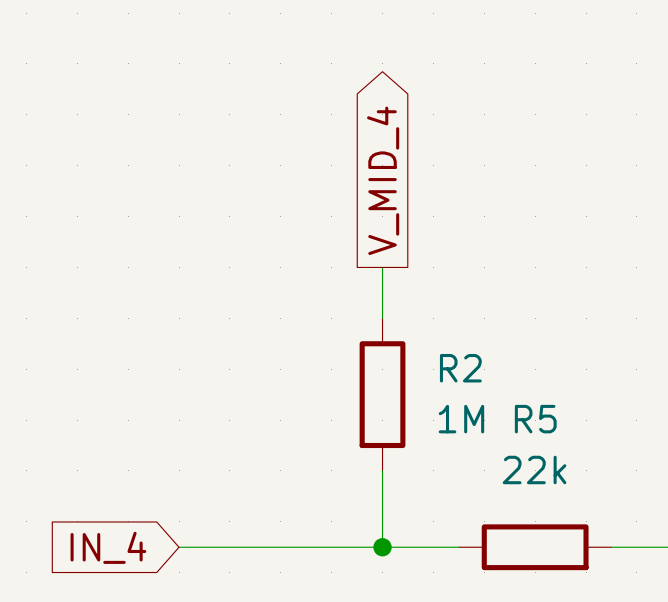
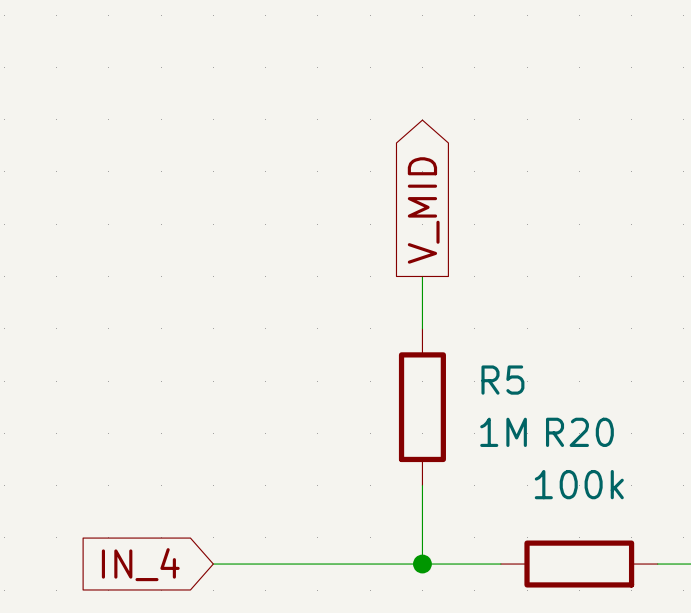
global label: V_MID_4 (383, 180) -> V_MID (423, 210)
R2 name: R2 (460, 368) -> R5 (502, 380)
R5 name: R5 (535, 419) -> R20 (579, 432)
R5 value: 22k (534, 469) -> 100k (579, 484)

